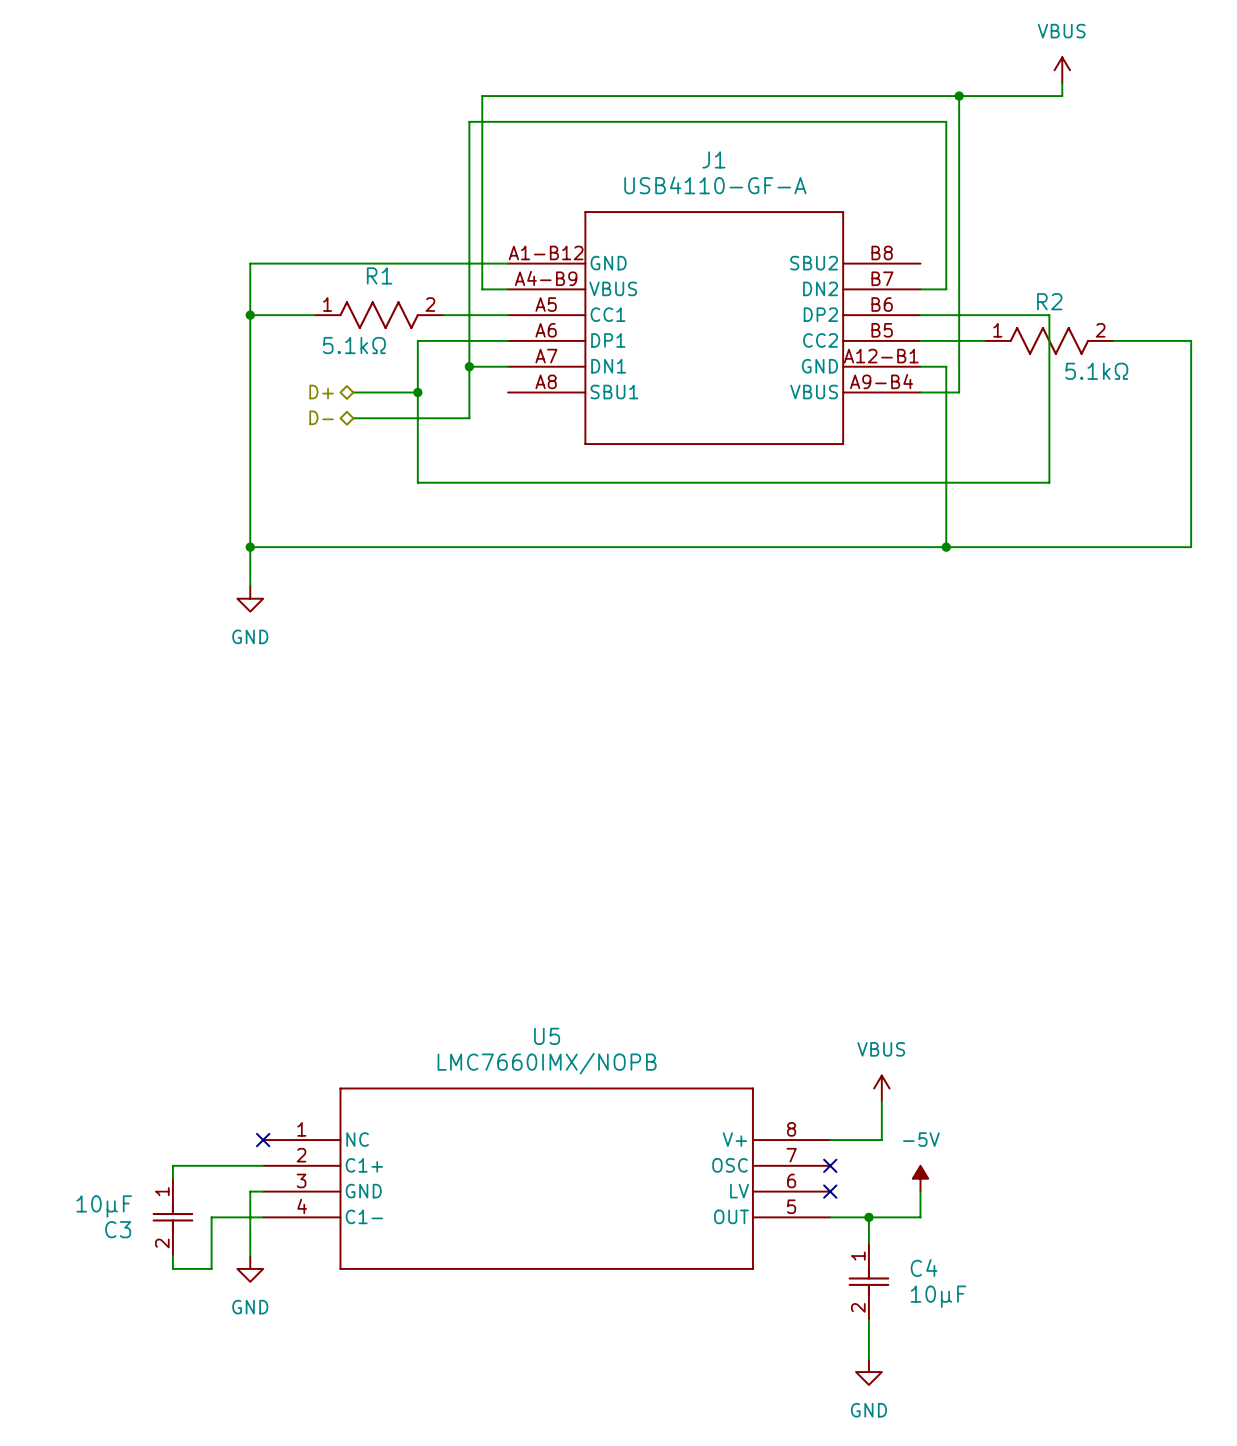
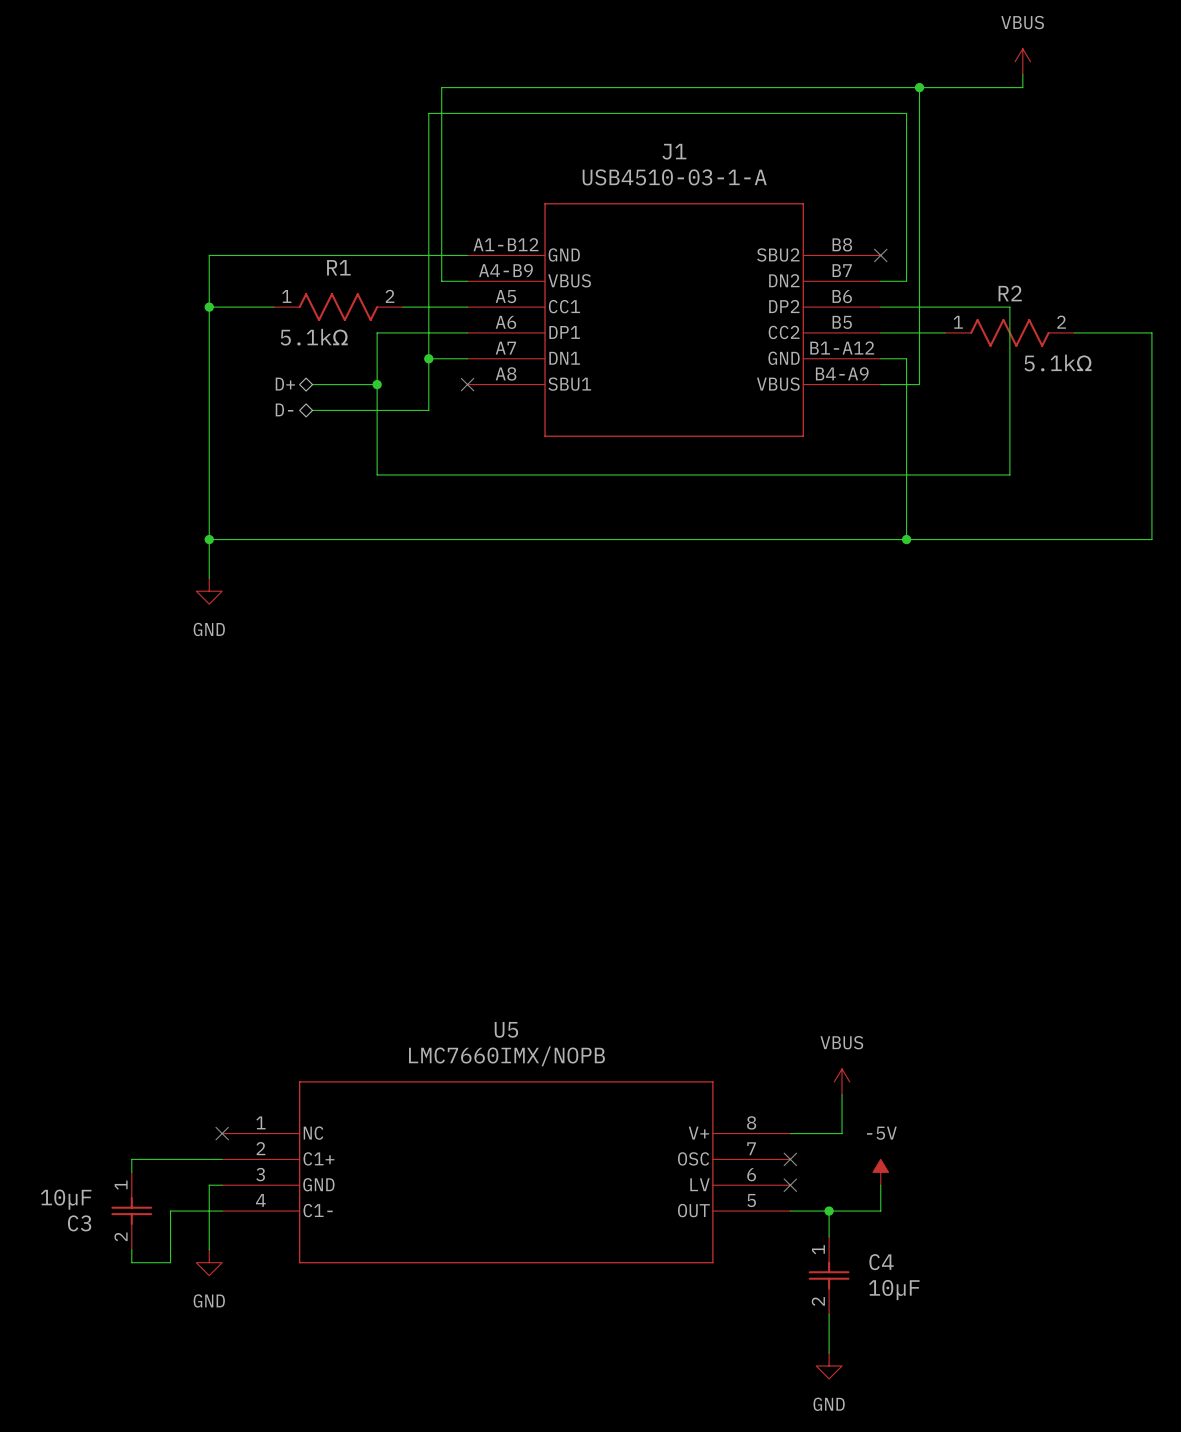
J1 value: USB4110-GF-A (715, 185) -> USB4510-03-1-A (674, 177)
no-connect mark: none -> (880, 255)
J1 pin number: A12-B1 (881, 356) -> B1-A12 (842, 348)
J1 pin number: A9-B4 (881, 381) -> B4-A9 (842, 373)
no-connect mark: none -> (467, 384)

